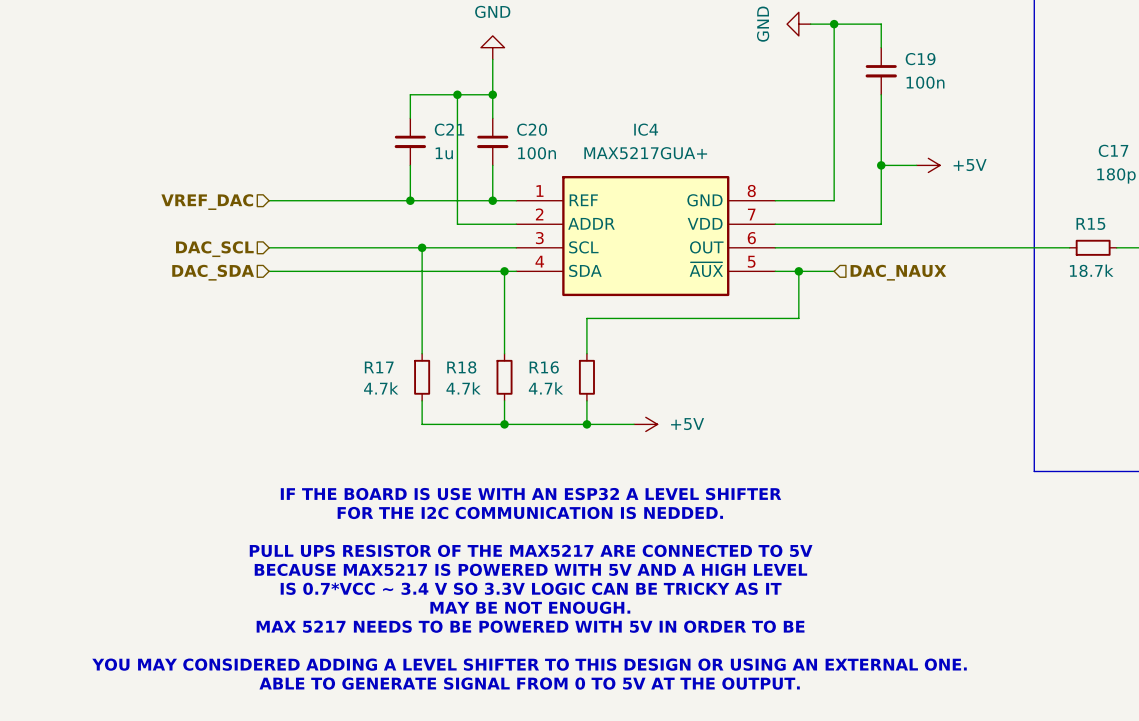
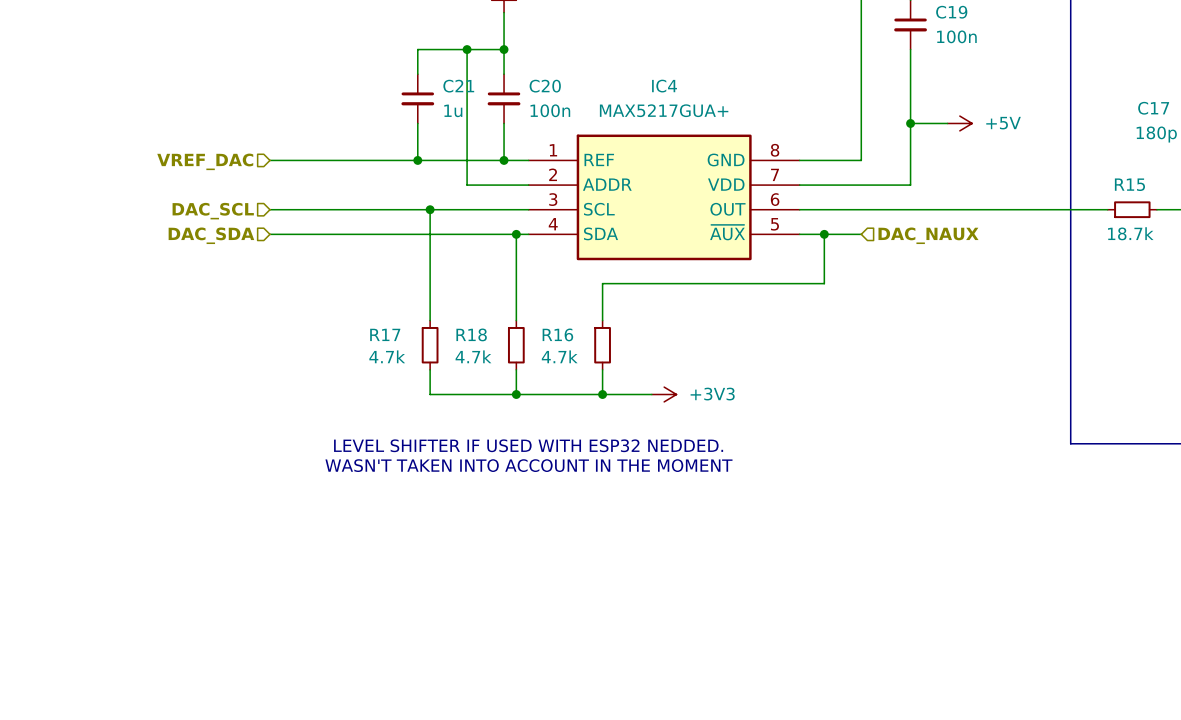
power symbol: +5V (645, 424) -> +3V3 (664, 394)
text: none -> LEVEL SHIFTER IF USED WITH ESP32 NEDDED. (528, 445)
text: none -> WASN'T TAKEN INTO ACCOUNT IN THE MOMENT (528, 465)
text: IF THE BOARD IS USE WITH AN ESP32 A LEVEL SHIFTER (531, 494) -> none
text: FOR THE I2C COMMUNICATION IS NEDDED. (530, 513) -> none
text: PULL UPS RESISTOR OF THE MAX5217 ARE CONNECTED TO 5V (531, 550) -> none
text: BECAUSE MAX5217 IS POWERED WITH 5V AND A HIGH LEVEL (530, 569) -> none
text: IS 0.7*VCC ~ 3.4 V SO 3.3V LOGIC CAN BE TRICKY AS IT (531, 588) -> none
text: MAY BE NOT ENOUGH. (530, 607) -> none
text: MAX 5217 NEEDS TO BE POWERED WITH 5V IN ORDER TO BE (530, 626) -> none
text: YOU MAY CONSIDERED ADDING A LEVEL SHIFTER TO THIS DESIGN OR USING AN EXTERNAL ONE. (529, 664) -> none
text: ABLE TO GENERATE SIGNAL FROM 0 TO 5V AT THE OUTPUT. (529, 683) -> none

